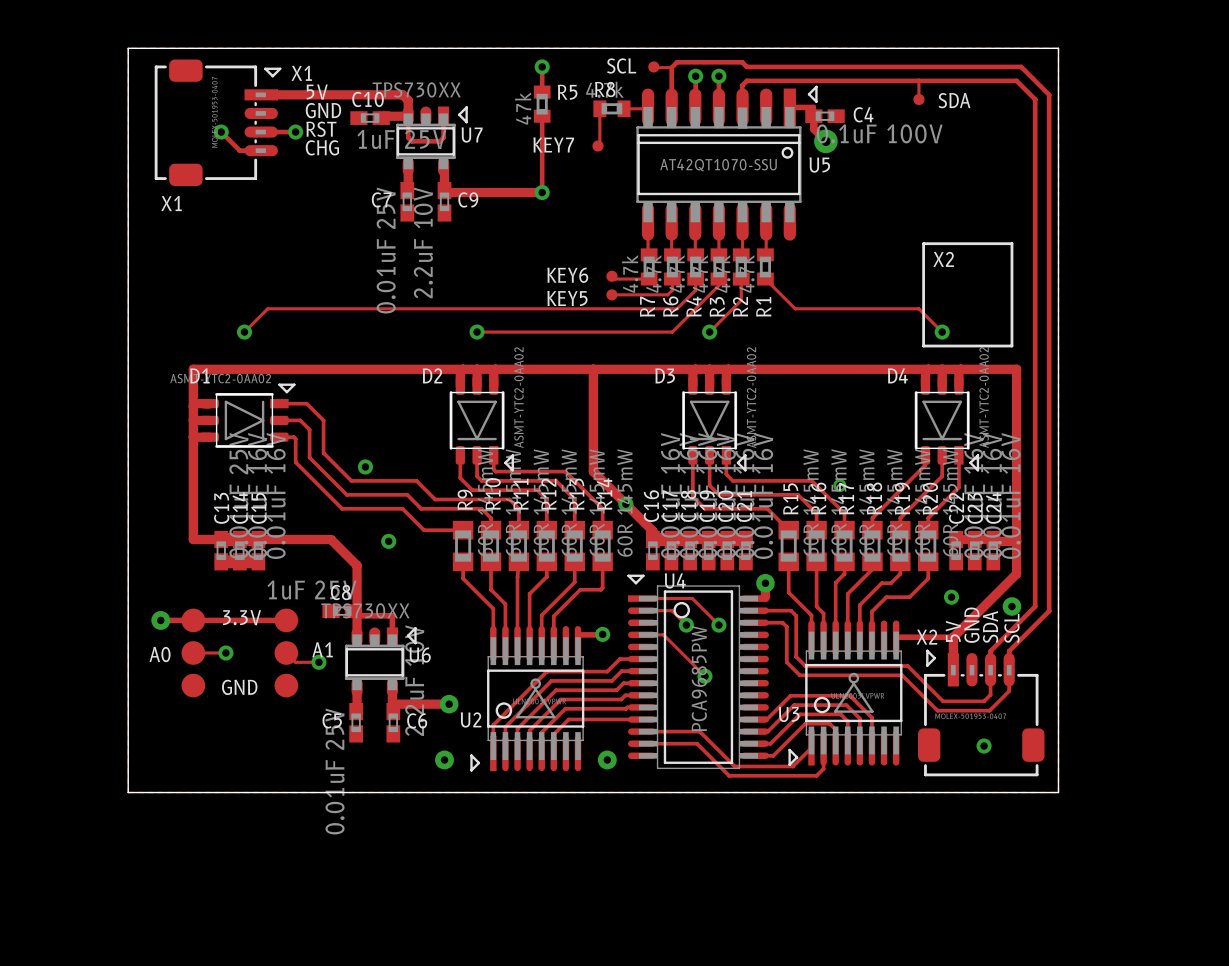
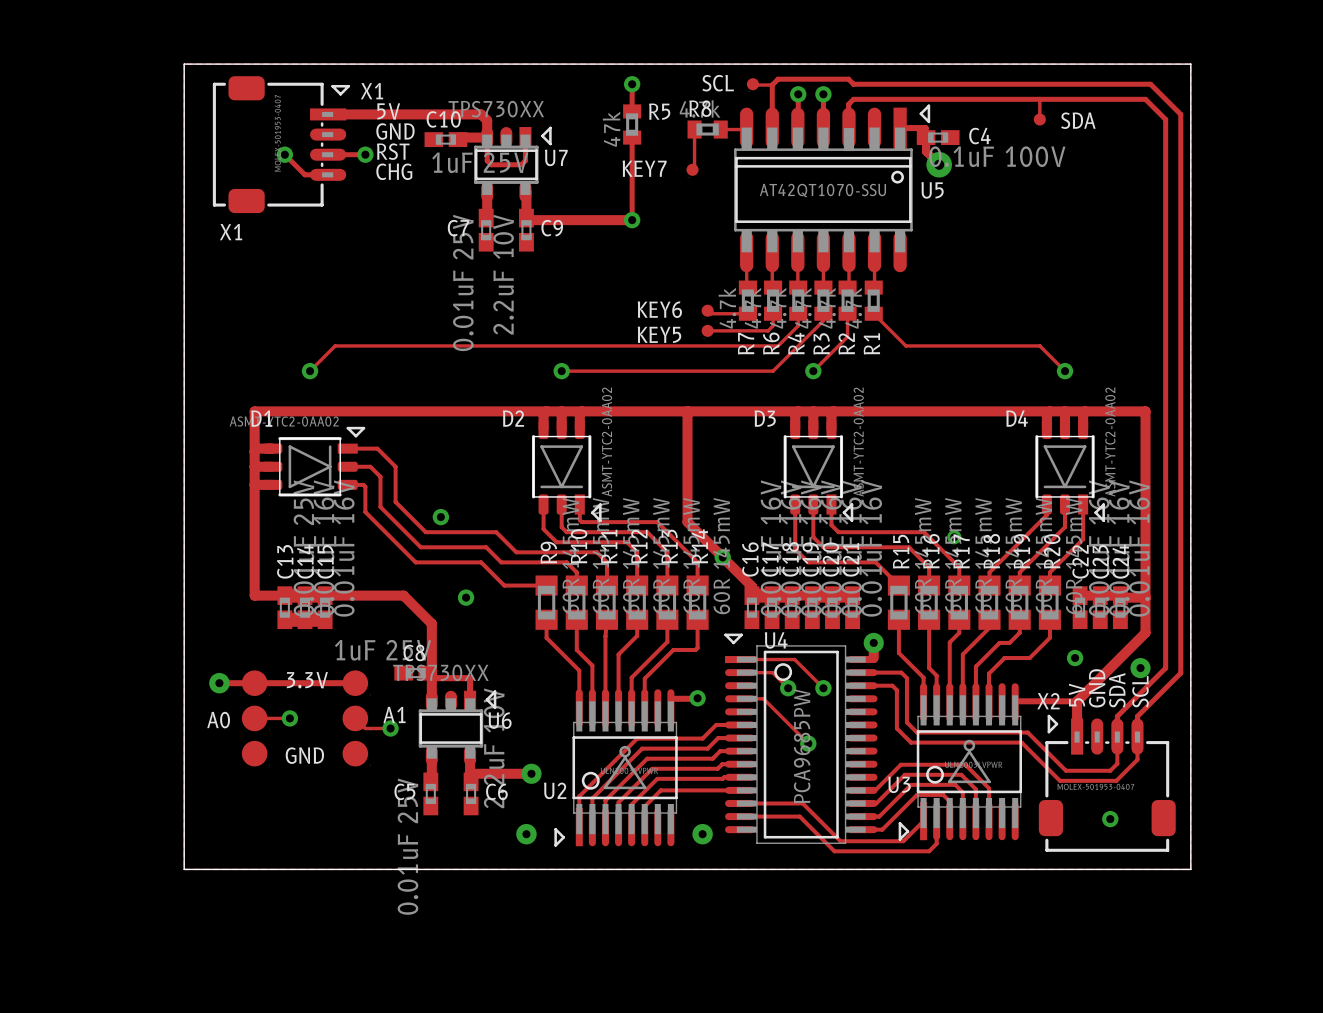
line: (923, 243) (1011, 243) (1011, 346) (923, 346) (923, 243) -> none
text: X2 (943, 259) -> none

